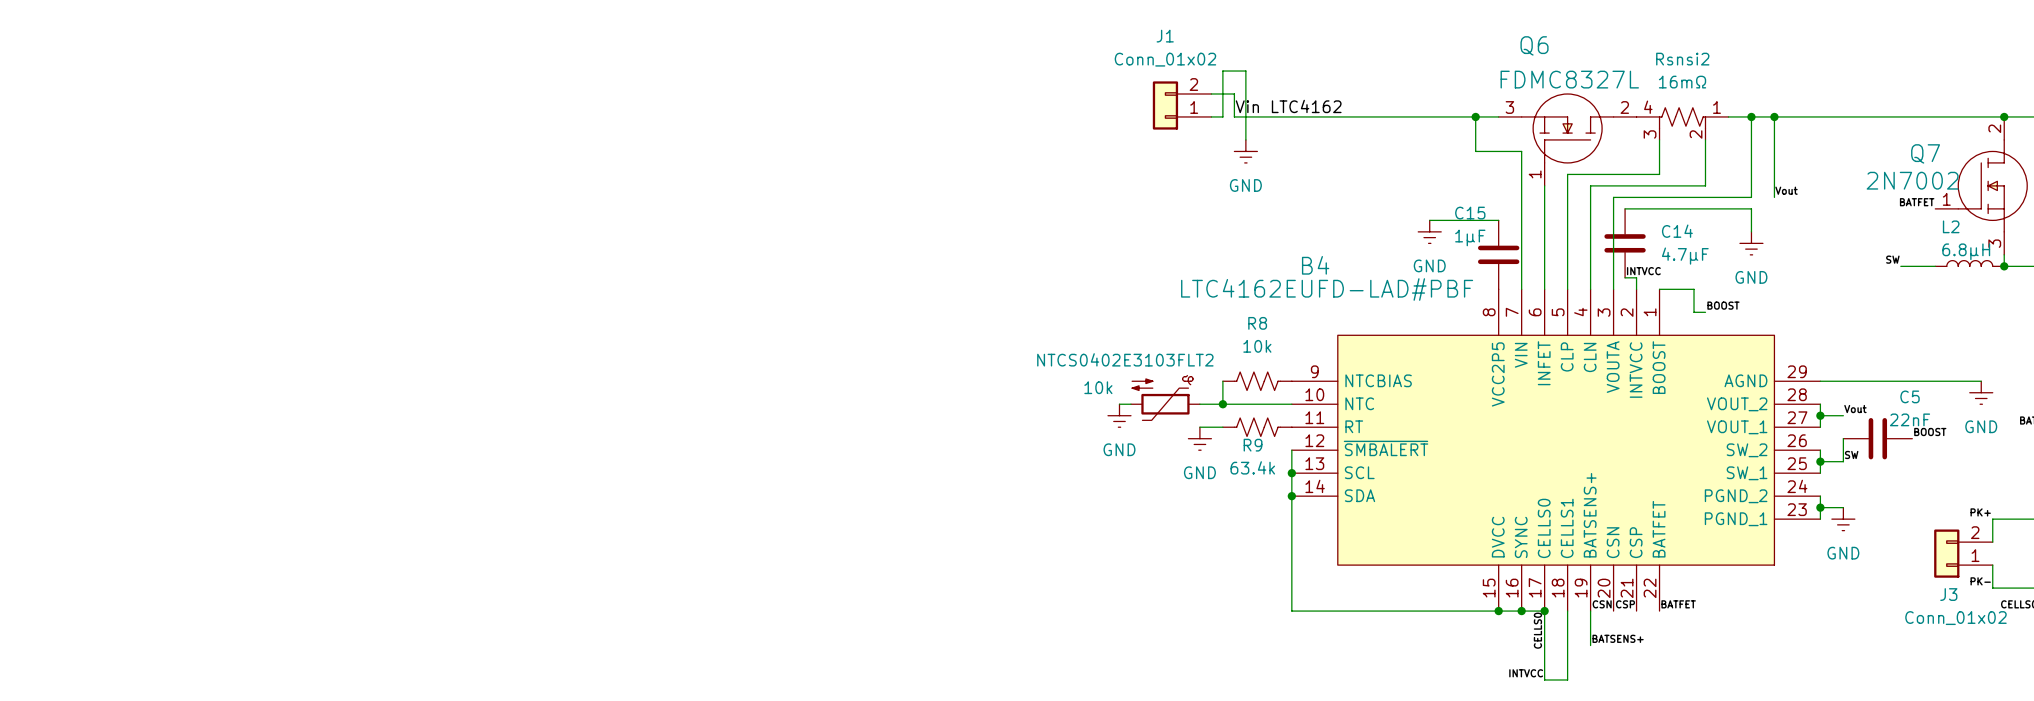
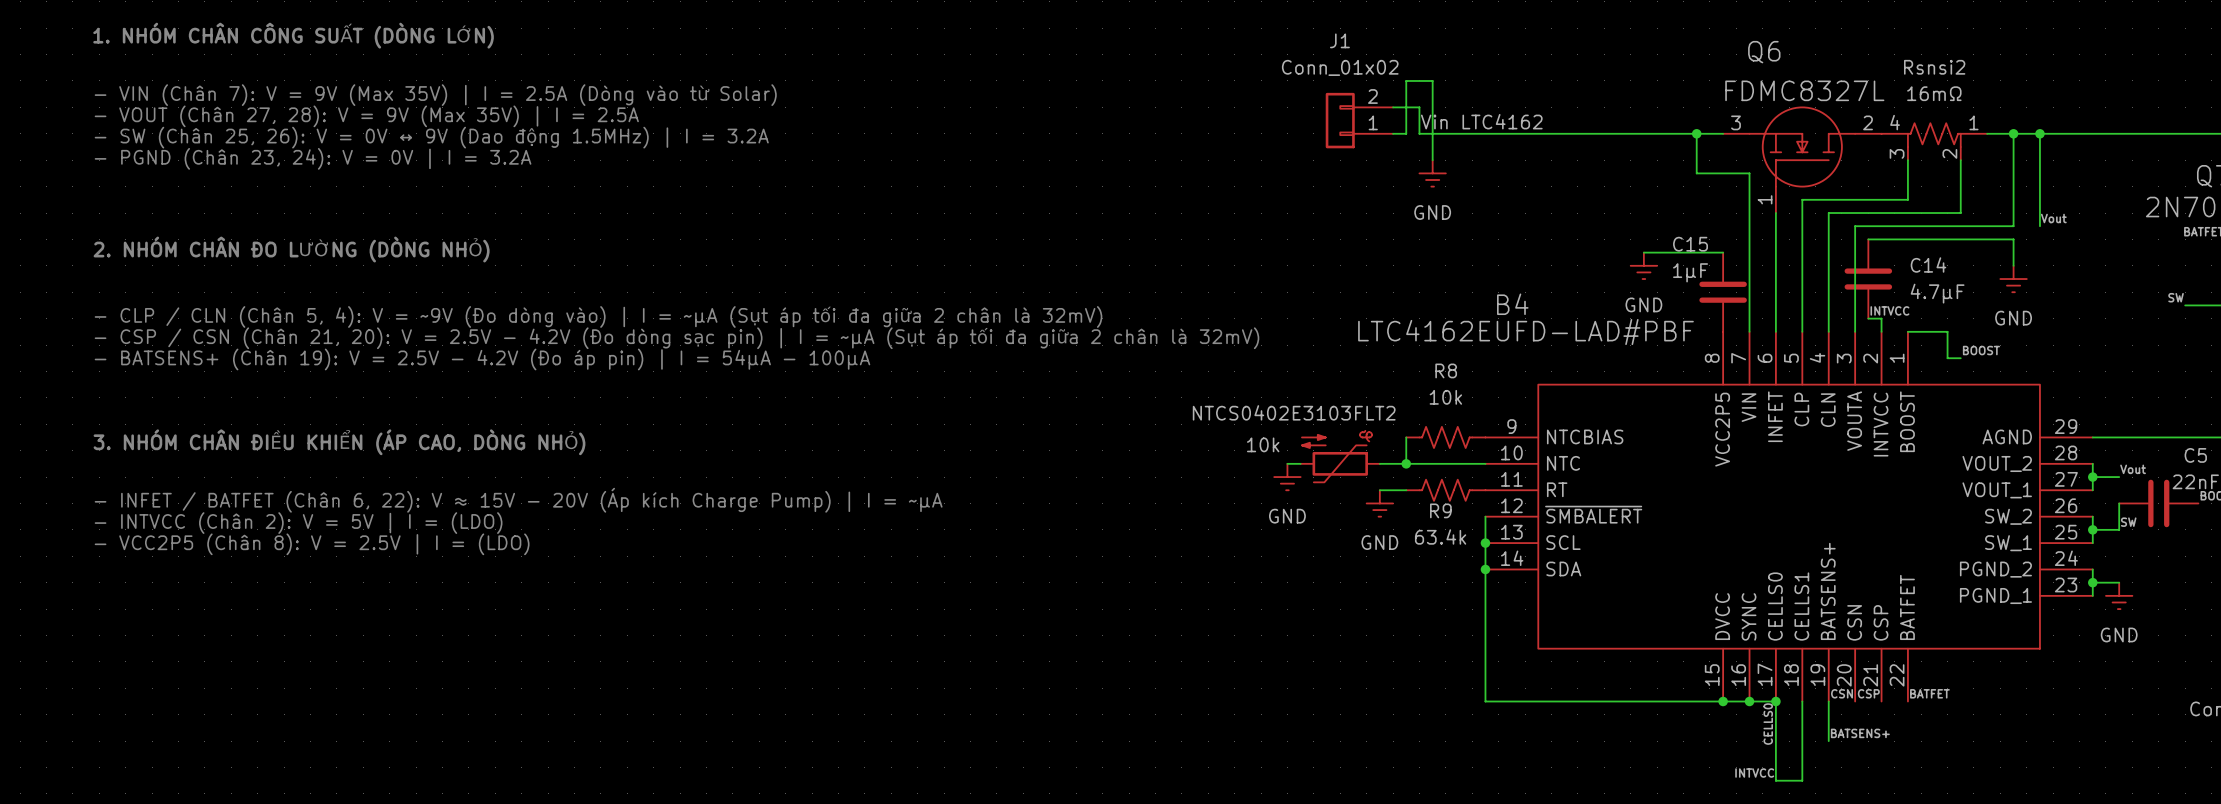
text: none -> 1. NHÓM CHÂN CÔNG SUẤT (DÒNG LỚN) (293, 35)
text: none -> - VIN (Chân 7): V = 9V (Max 35V) | I = 2.5A (Dòng vào từ Solar) (435, 95)
text: none -> - VOUT (Chân 27, 28): V = 9V (Max 35V) | I = 2.5A (366, 116)
text: none -> - SW (Chân 25, 26): V = 0V ↔ 9V (Dao động 1.5MHz) | I = 3.2A (431, 137)
text: none -> - PGND (Chân 23, 24): V = 0V | I = 3.2A (313, 158)
text: none -> 2. NHÓM CHÂN ĐO LƯỜNG (DÒNG NHỎ) (291, 249)
text: none -> - CLP / CLN (Chân 5, 4): V = ~9V (Đo dòng vào) | I = ~µA (Sụt áp tối đa giữa 2 chân là 32mV) (598, 316)
text: none -> - CSP / CSN (Chân 21, 20): V = 2.5V - 4.2V (Đo dòng sạc pin) | I = ~µA (Sụt áp tối đa giữa 2 chân là 32mV) (676, 338)
text: none -> - BATSENS+ (Chân 19): V = 2.5V - 4.2V (Đo áp pin) | I = 54µA - 100µA (482, 359)
text: none -> 3. NHÓM CHÂN ĐIỀU KHIỂN (ÁP CAO, DÒNG NHỎ) (339, 441)
text: none -> - INFET / BATFET (Chân 6, 22): V ≈ 15V - 20V (Áp kích Charge Pump) | I = ~µA (518, 500)
text: none -> - INTVCC (Chân 2): V = 5V | I = (LDO) (298, 523)
text: none -> - VCC2P5 (Chân 8): V = 2.5V | I = (LDO) (312, 544)

